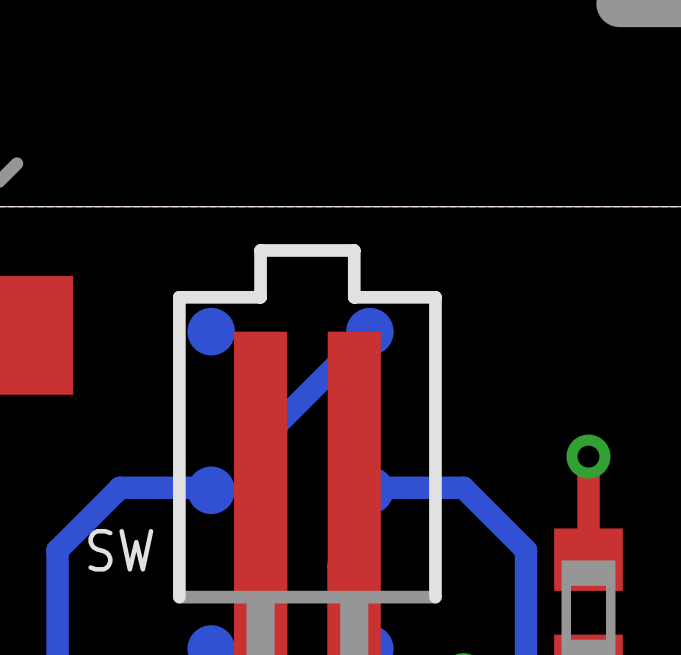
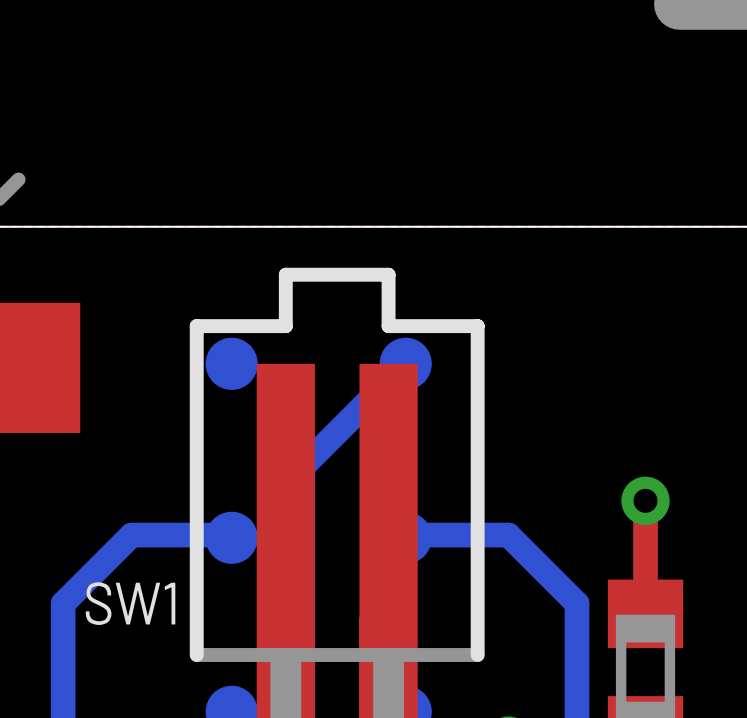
SW name: SW (120, 550) -> SW1 (130, 603)

